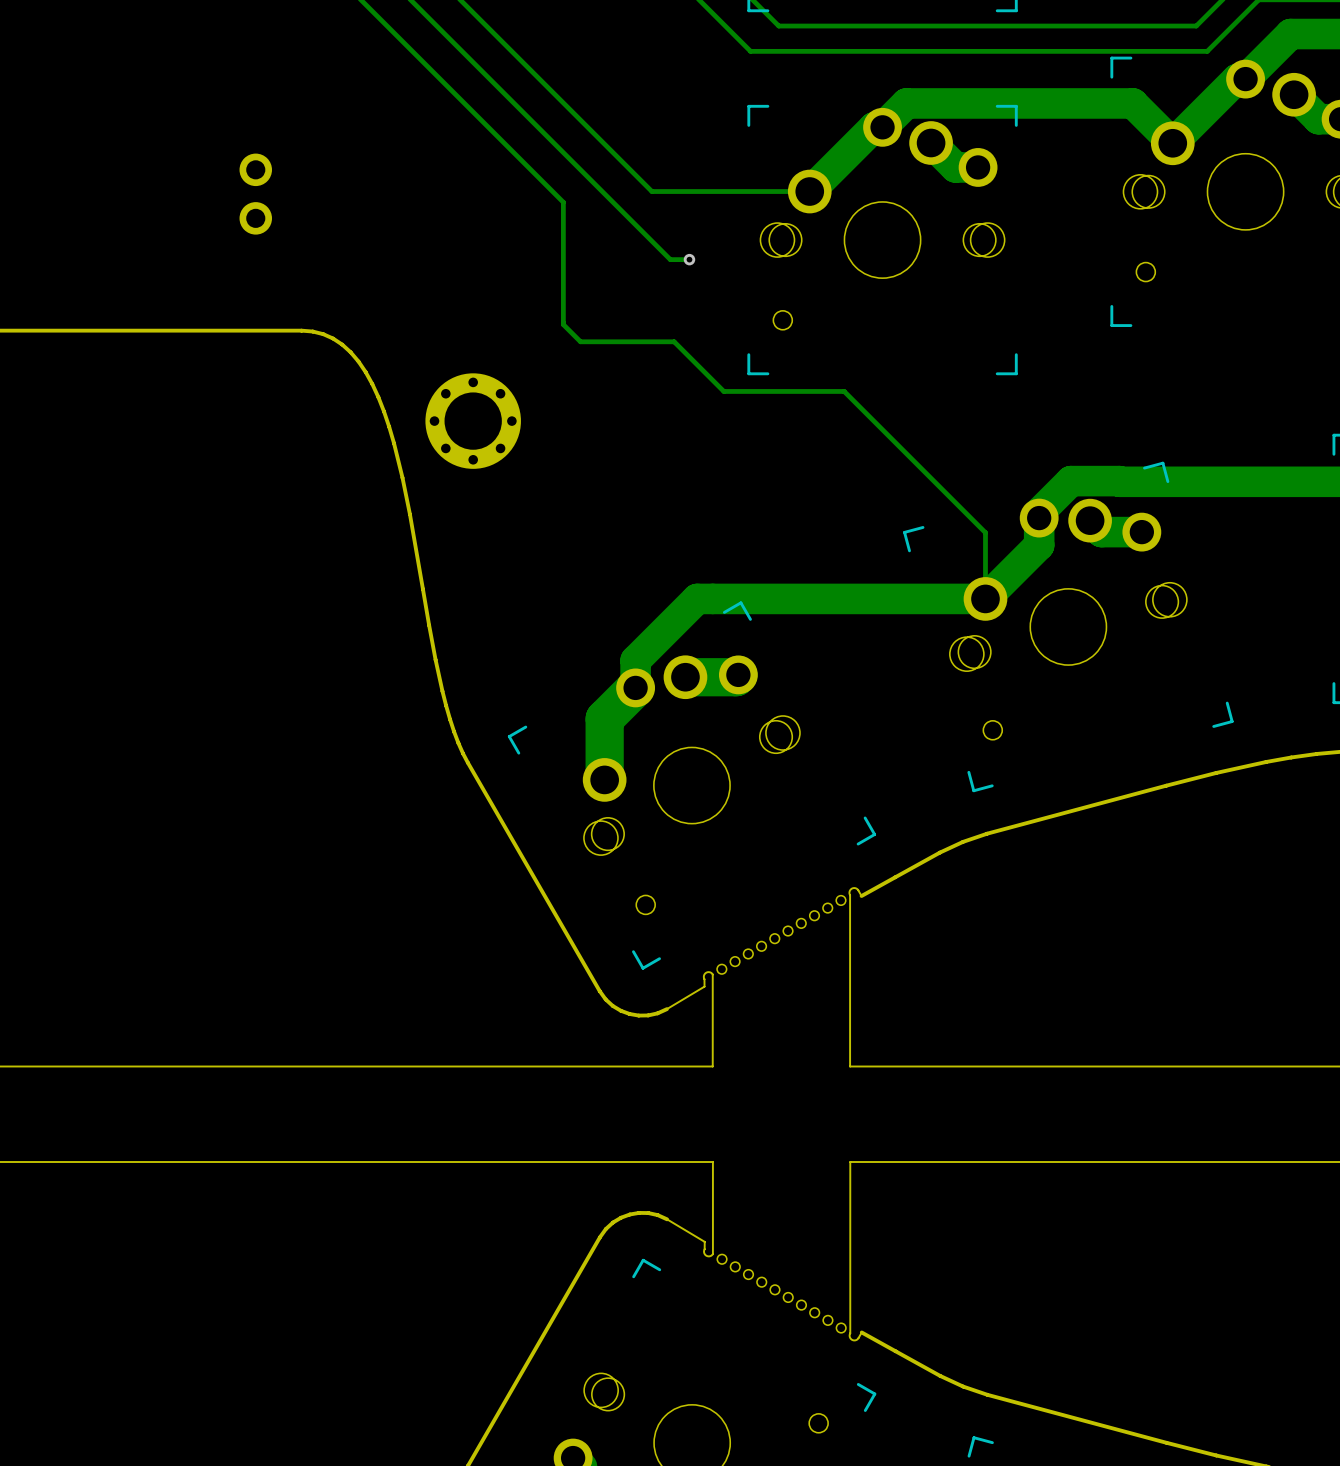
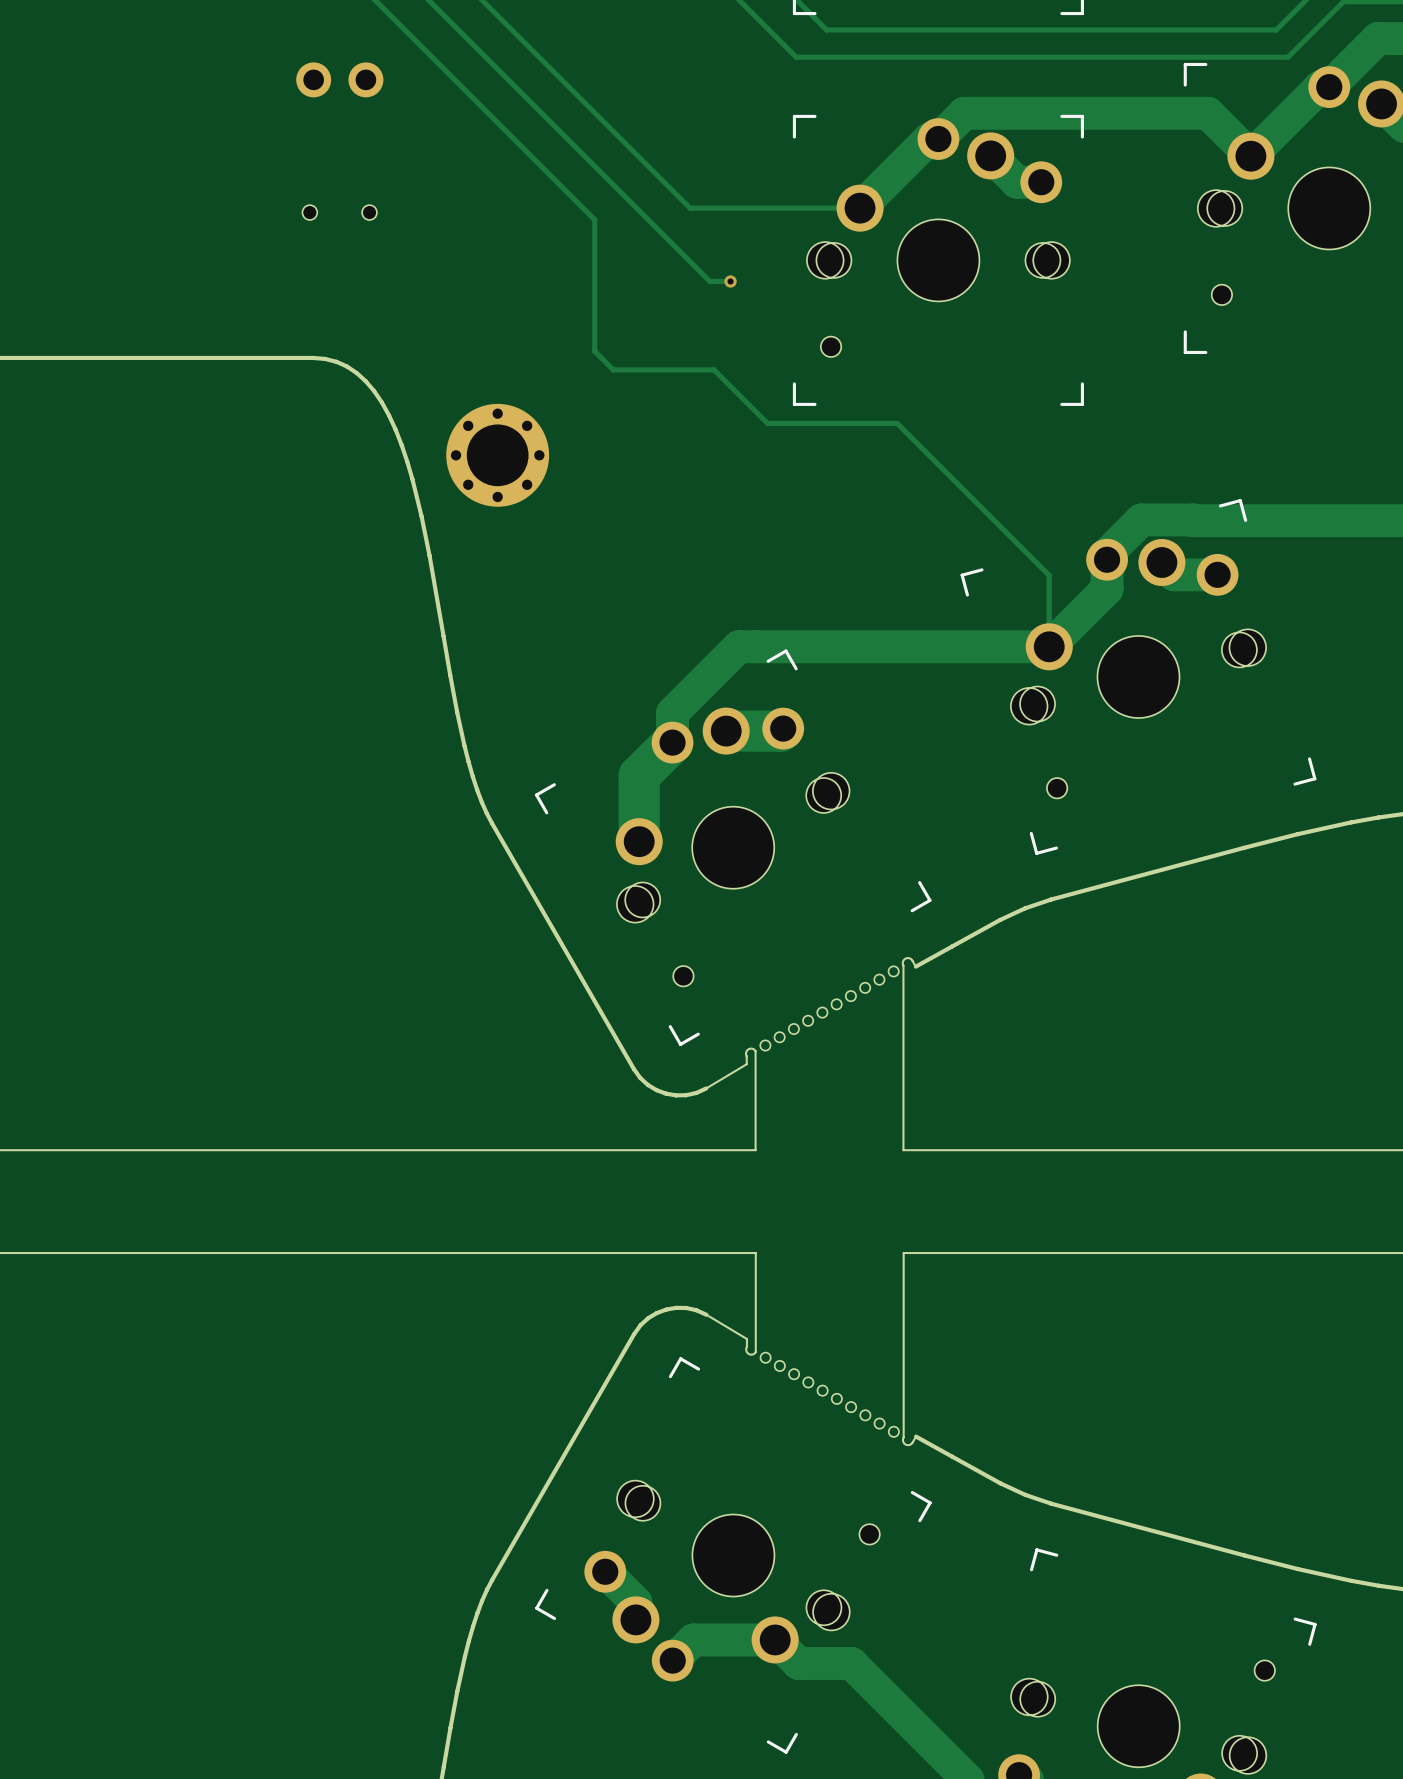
part rotation: 0° (255, 194) -> 90° clockwise (339, 79)
part position: (255, 194) -> (339, 79)
part: none -> (339, 212)

